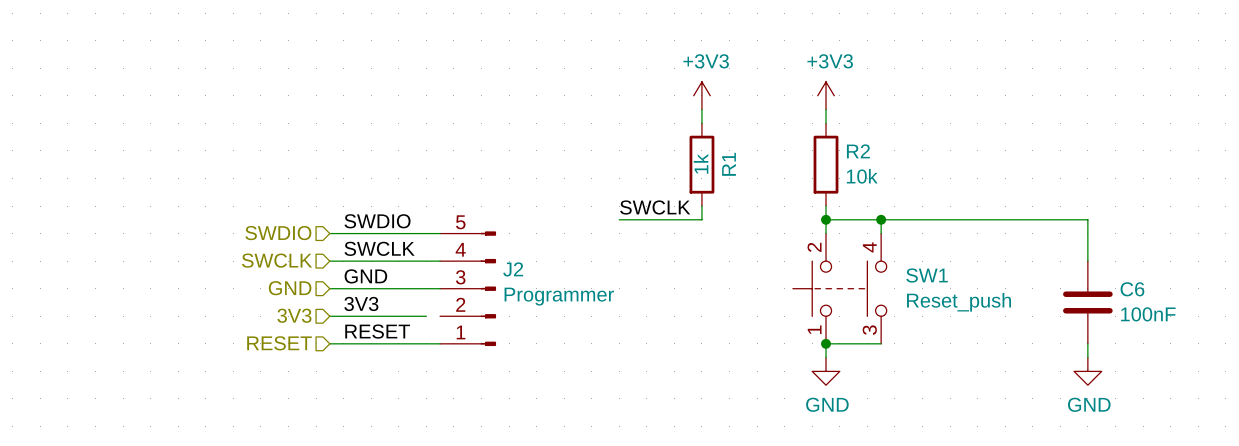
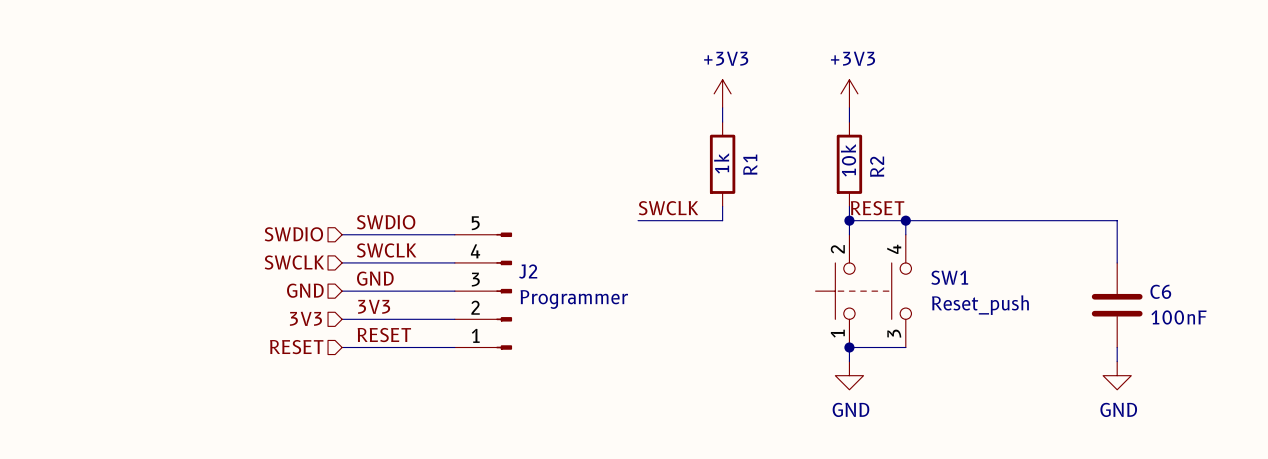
R2 name rotation: 0° (858, 151) -> 90° counterclockwise (877, 166)
R2 value rotation: 0° (862, 176) -> 90° counterclockwise (848, 160)
R2 value position: 10k (862, 176) -> 10k (848, 160)
label: none -> RESET (877, 208)
wire: none -> (440, 319) (454, 319)

